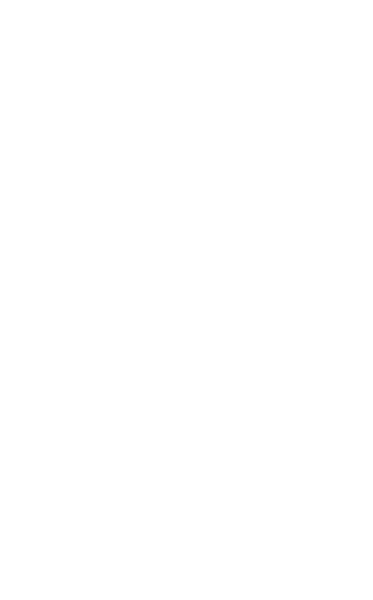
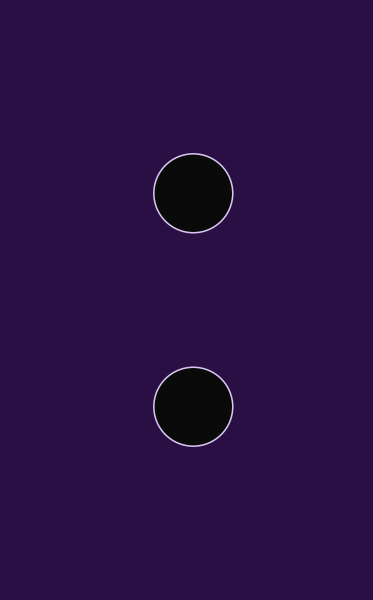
part: none -> (193, 193)
part: none -> (193, 406)

